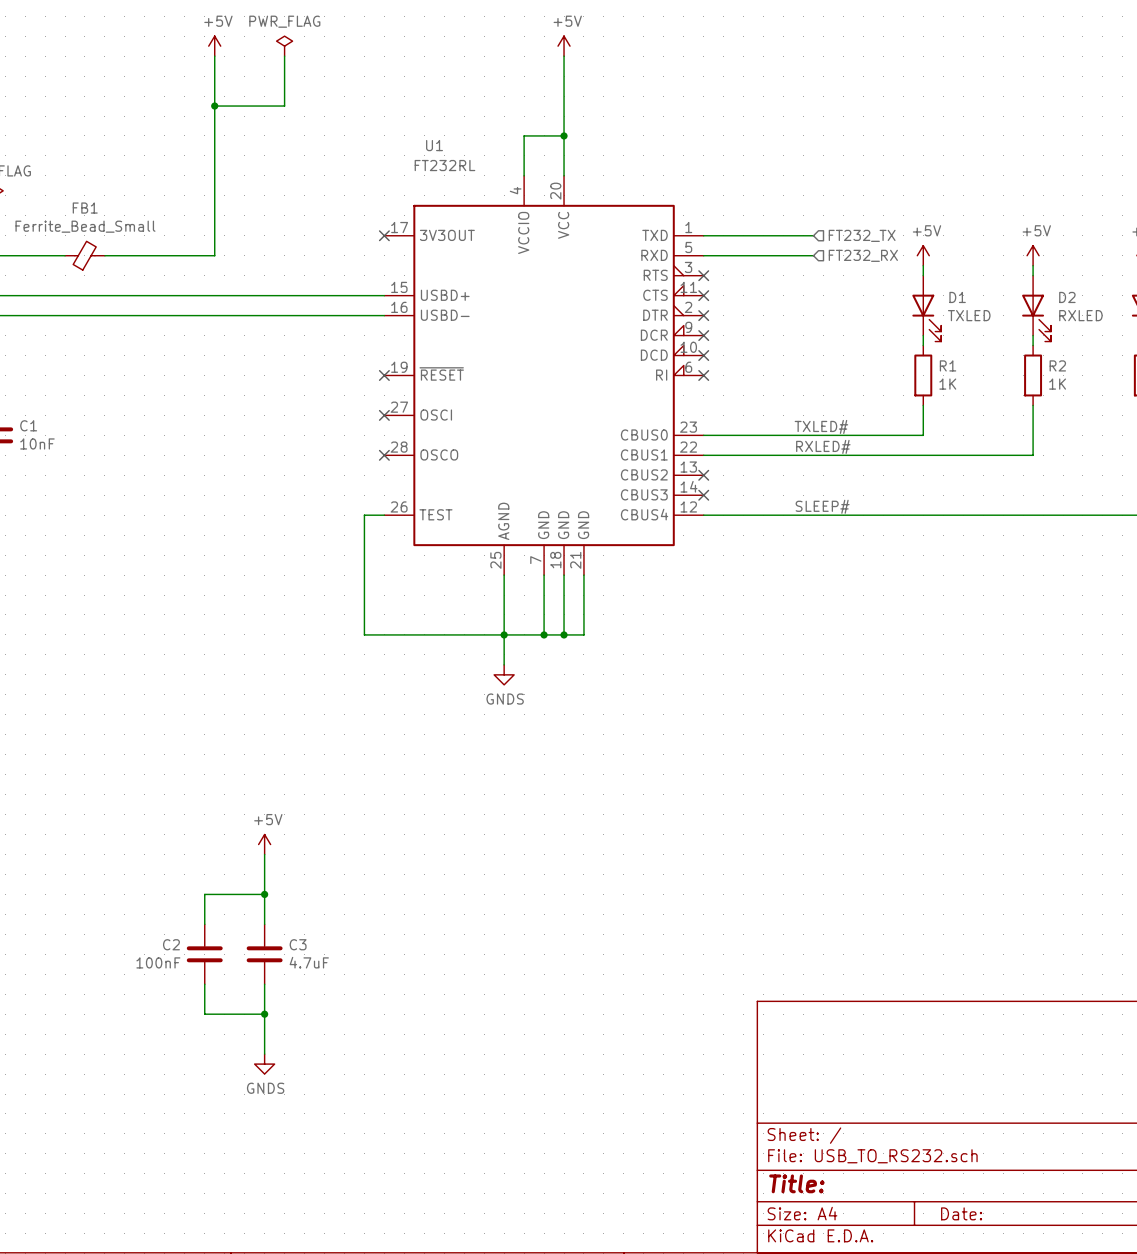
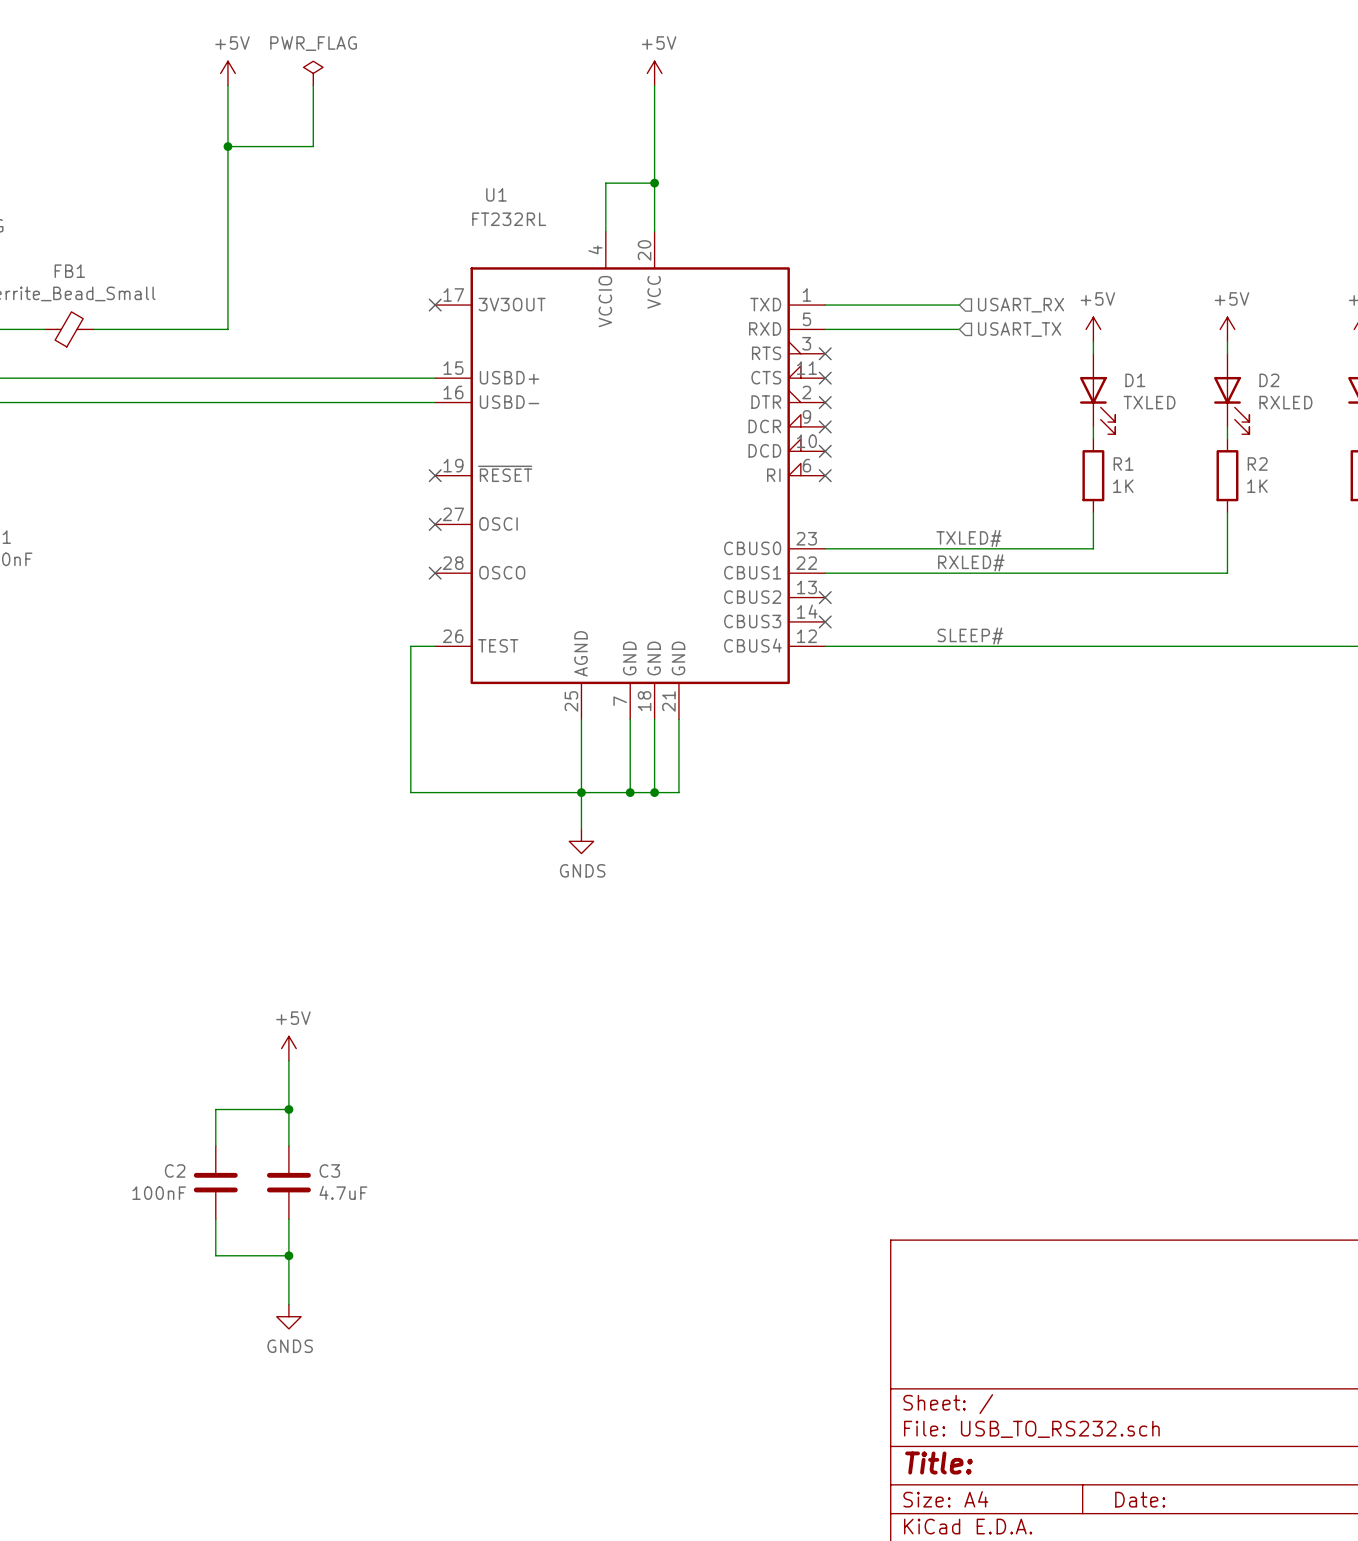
hierarchical label: FT232_TX (862, 235) -> USART_RX (1021, 305)
hierarchical label: FT232_RX (863, 255) -> USART_TX (1019, 329)

